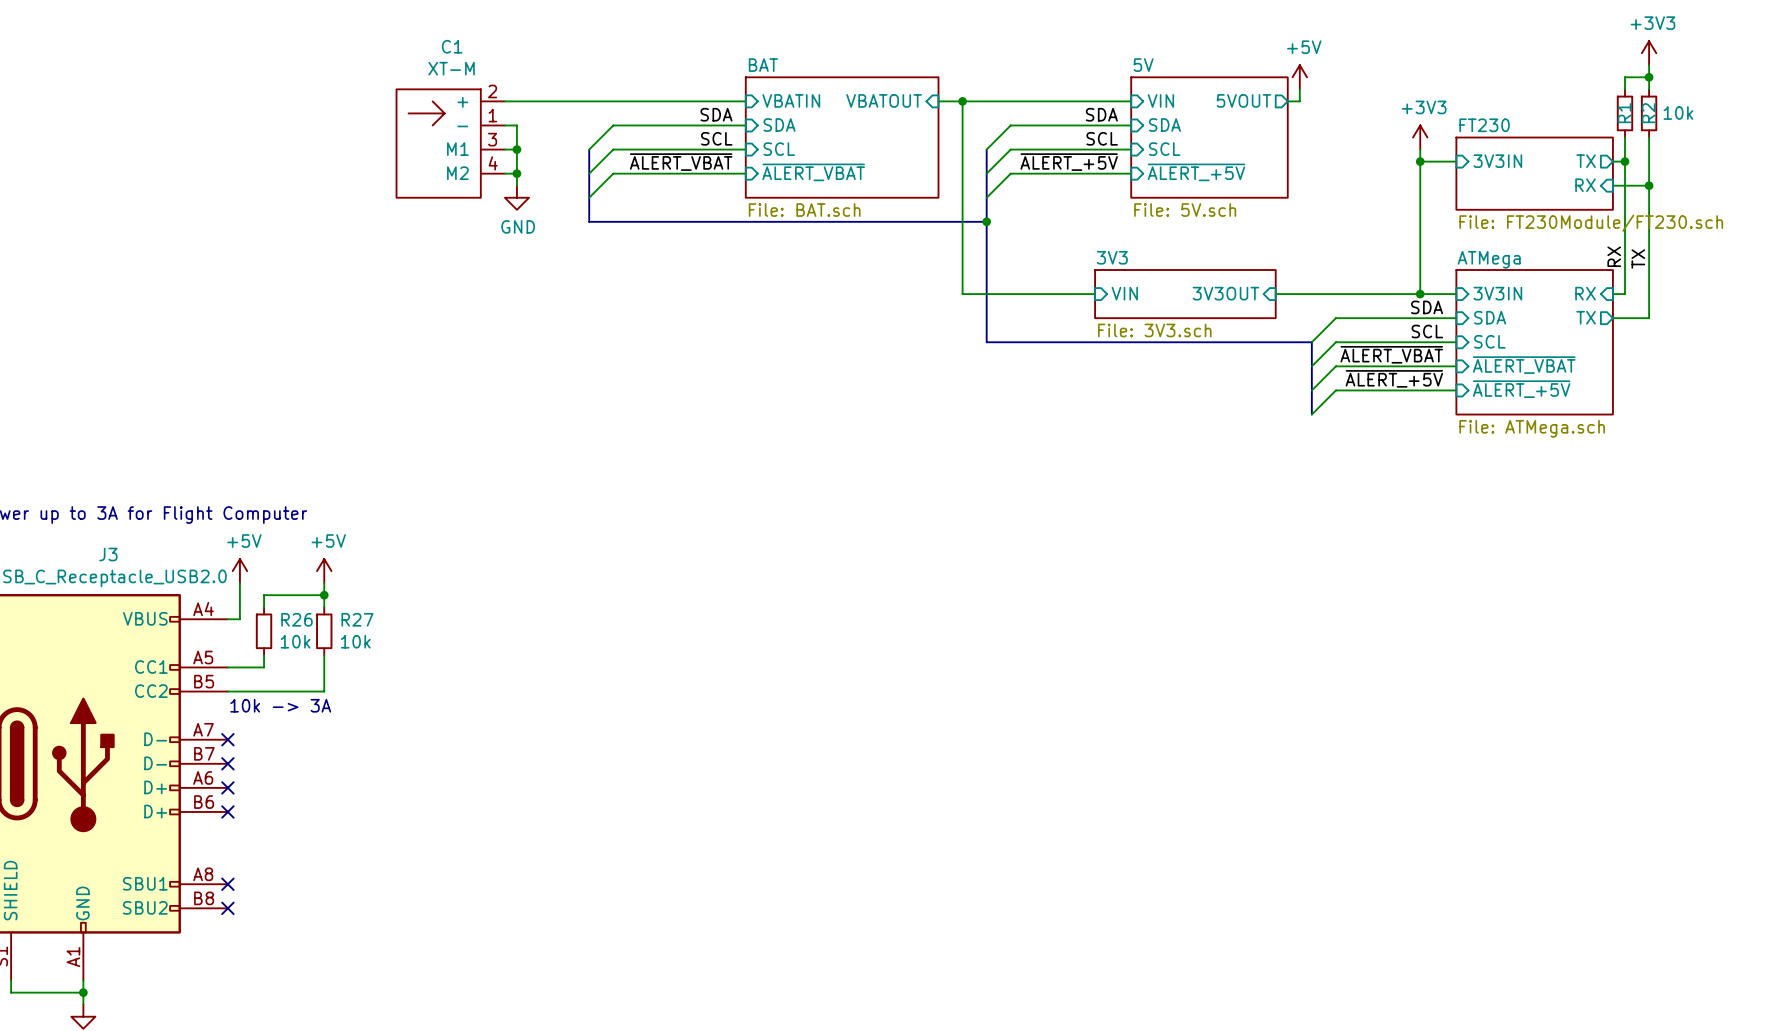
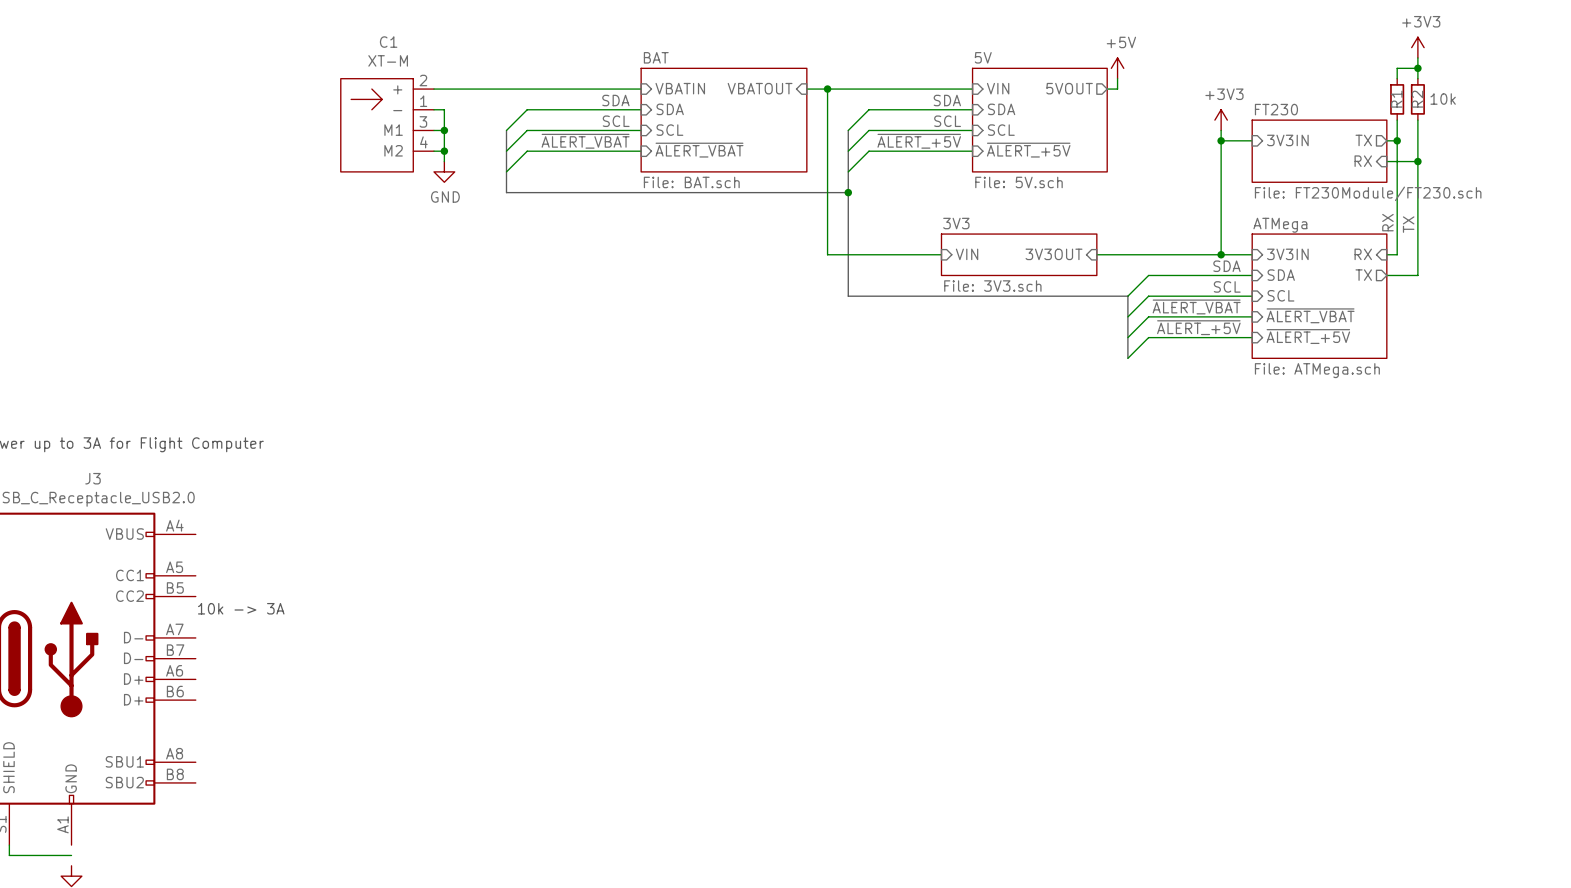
power symbol: +5V (239, 571) -> none
power symbol: +5V (324, 571) -> none
wire: (239, 583) (239, 619) (227, 619) -> none
wire: (324, 583) (324, 607) -> none
wire: (324, 595) (264, 595) (264, 607) -> none
junction: (324, 595) -> none
R26: 10k (264, 631) -> none
R27: 10k (324, 631) -> none
wire: (264, 655) (264, 667) (227, 667) -> none
wire: (324, 655) (324, 691) (227, 691) -> none
no-connect mark: (227, 739) -> none
no-connect mark: (227, 763) -> none
no-connect mark: (227, 787) -> none
no-connect mark: (227, 811) -> none
no-connect mark: (227, 884) -> none
no-connect mark: (227, 908) -> none
wire: (83, 980) (83, 1004) -> none
junction: (83, 992) -> none

